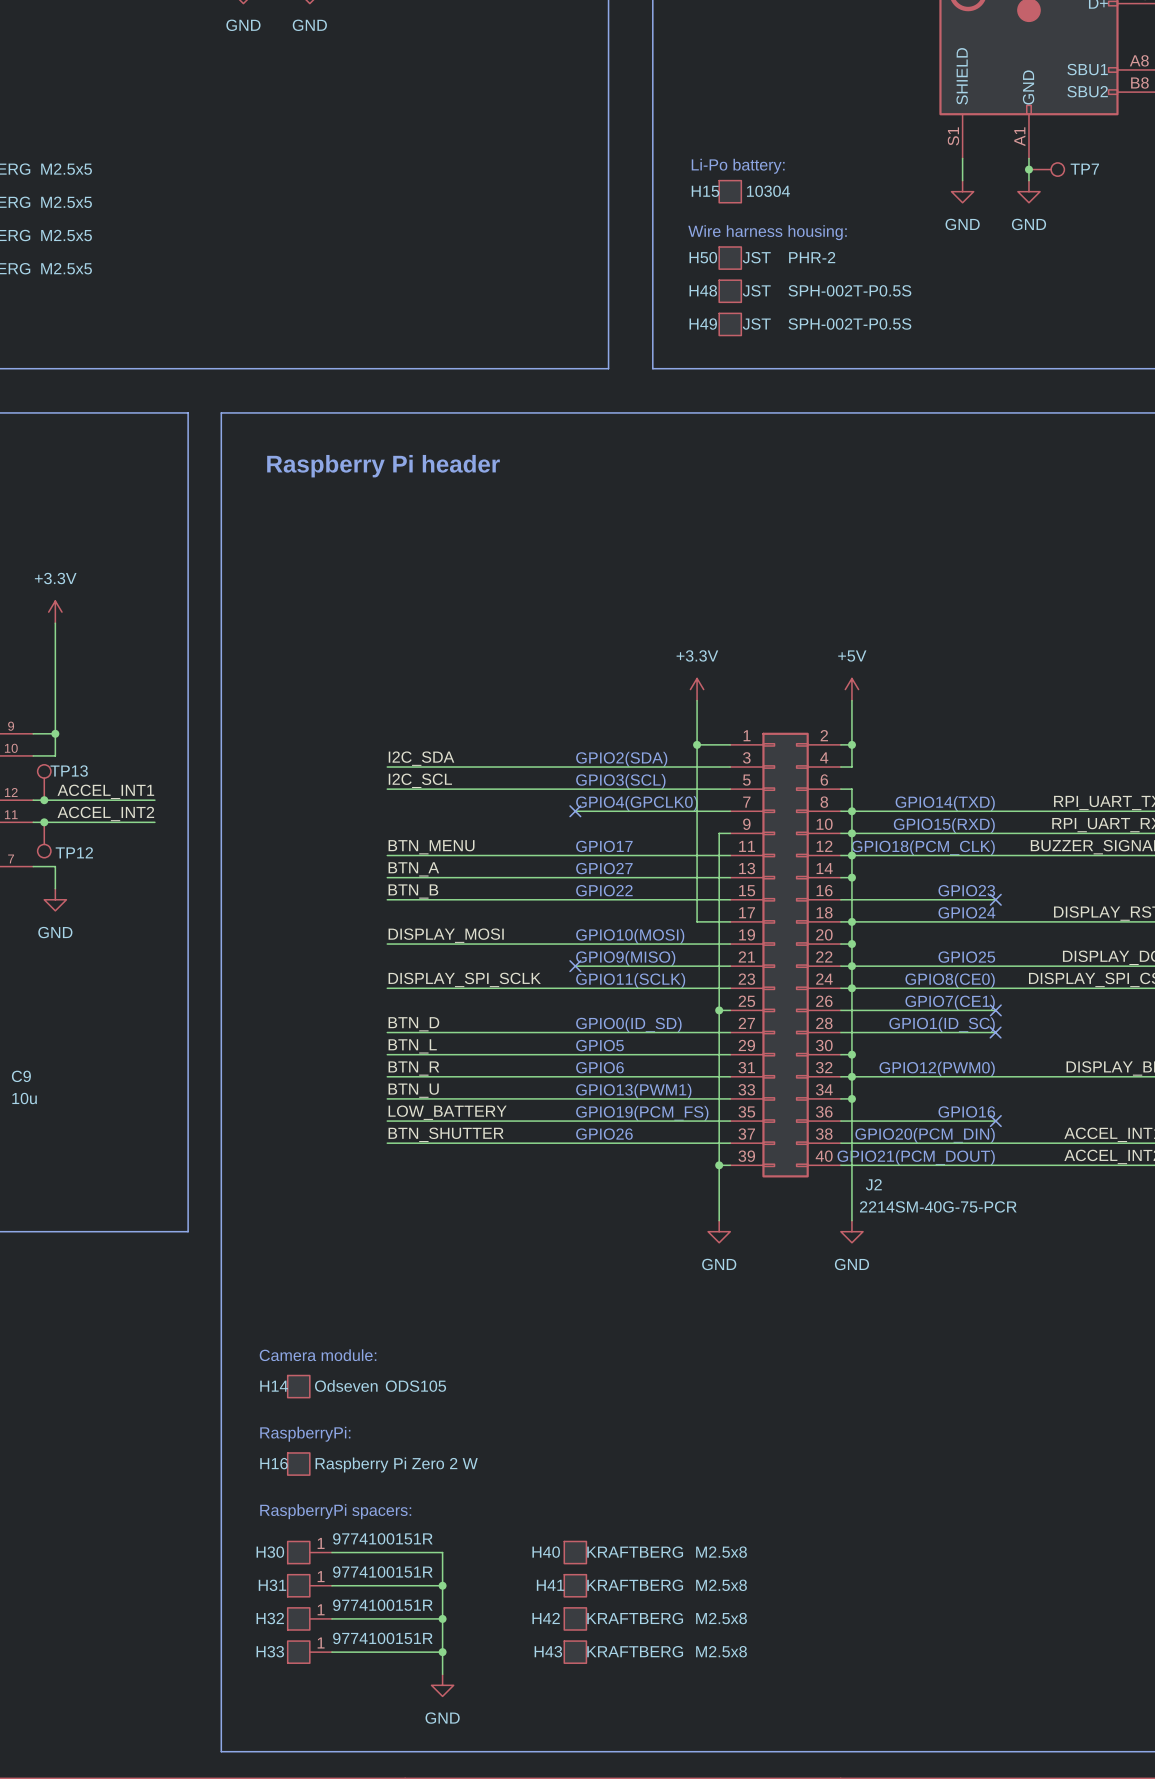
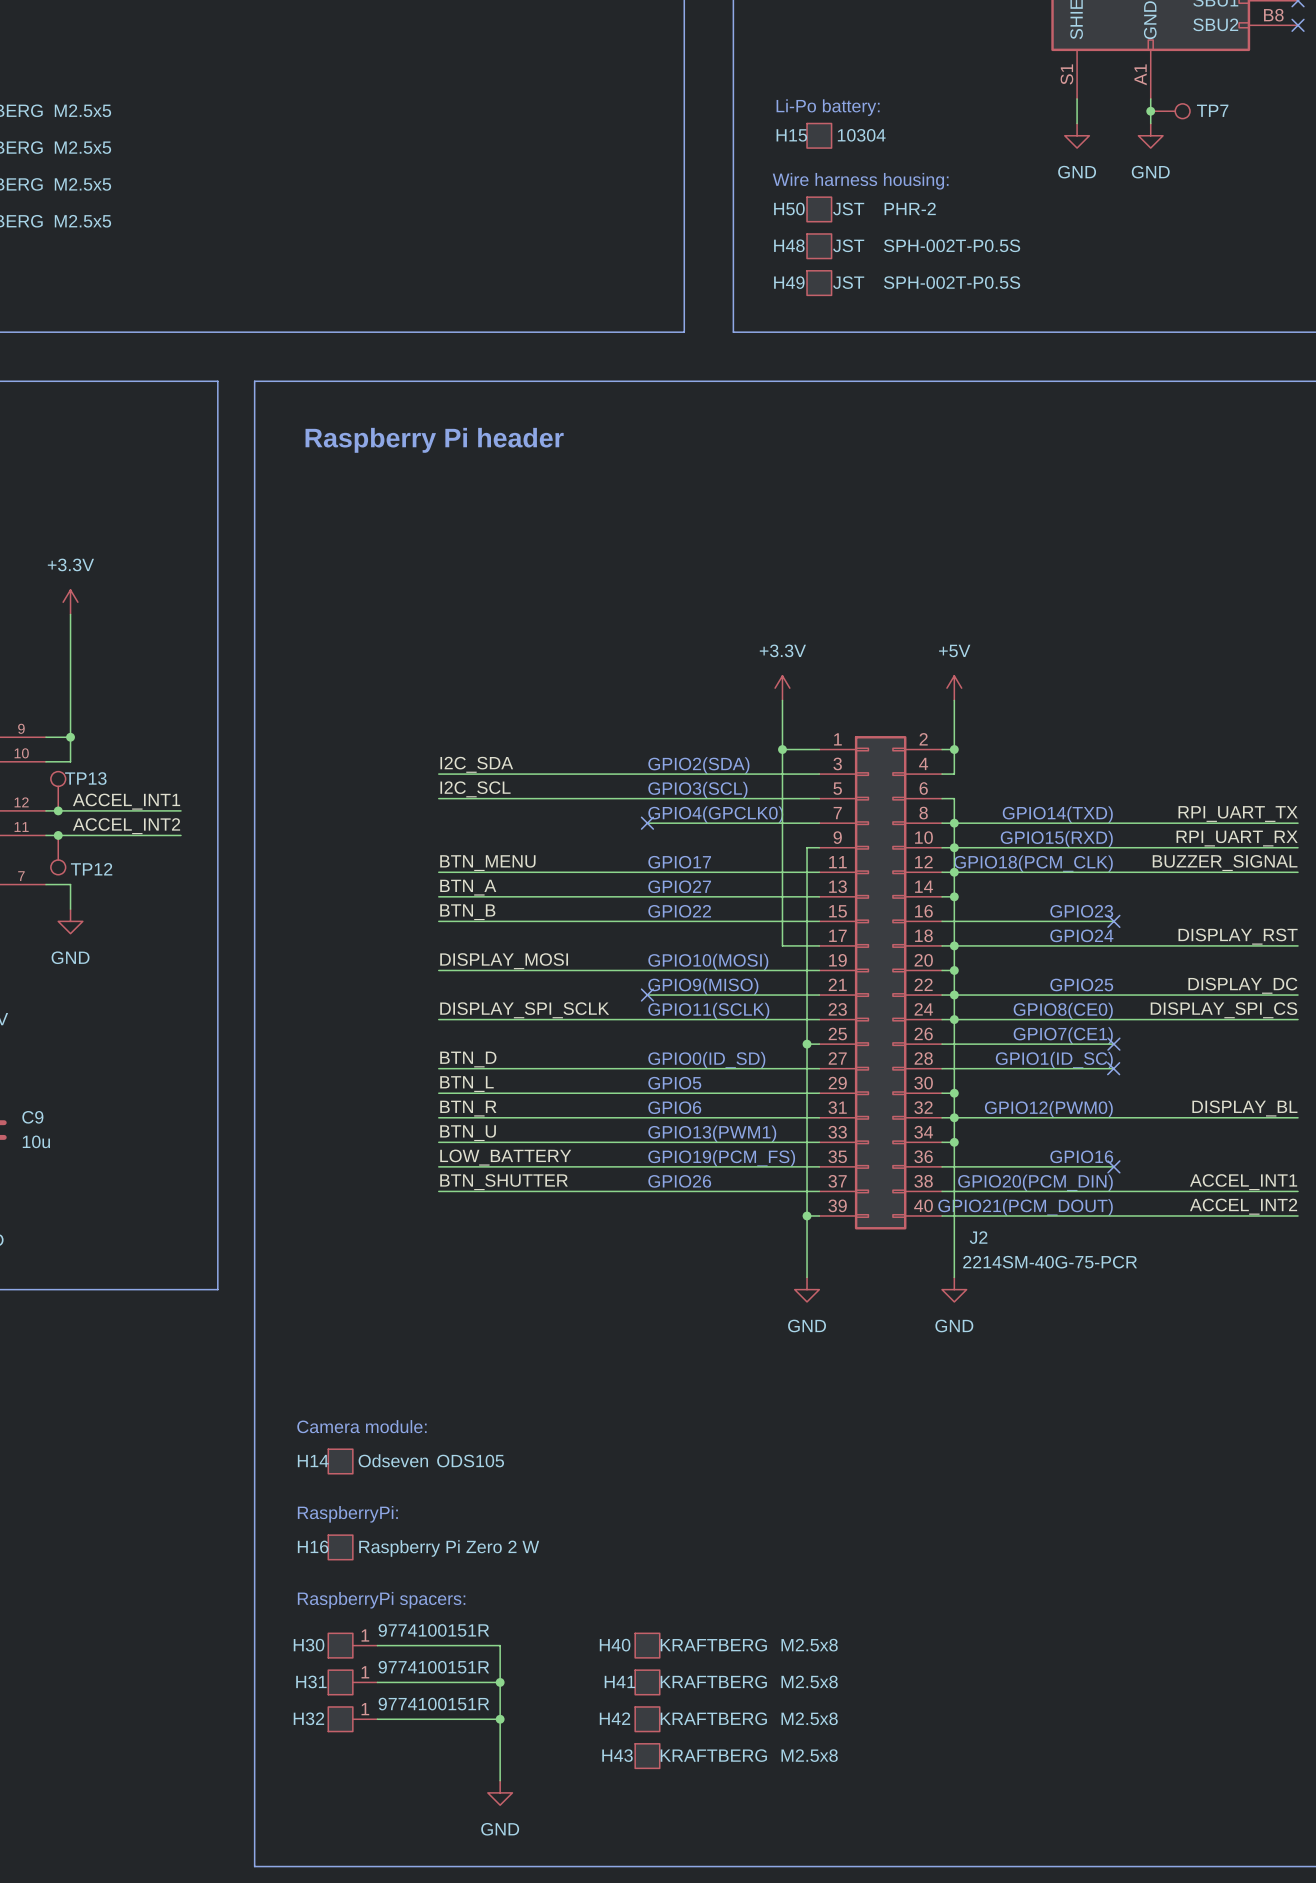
H33: 9774100151R (309, 1652) -> none
wire: (331, 1652) (442, 1652) -> none
junction: (442, 1652) -> none

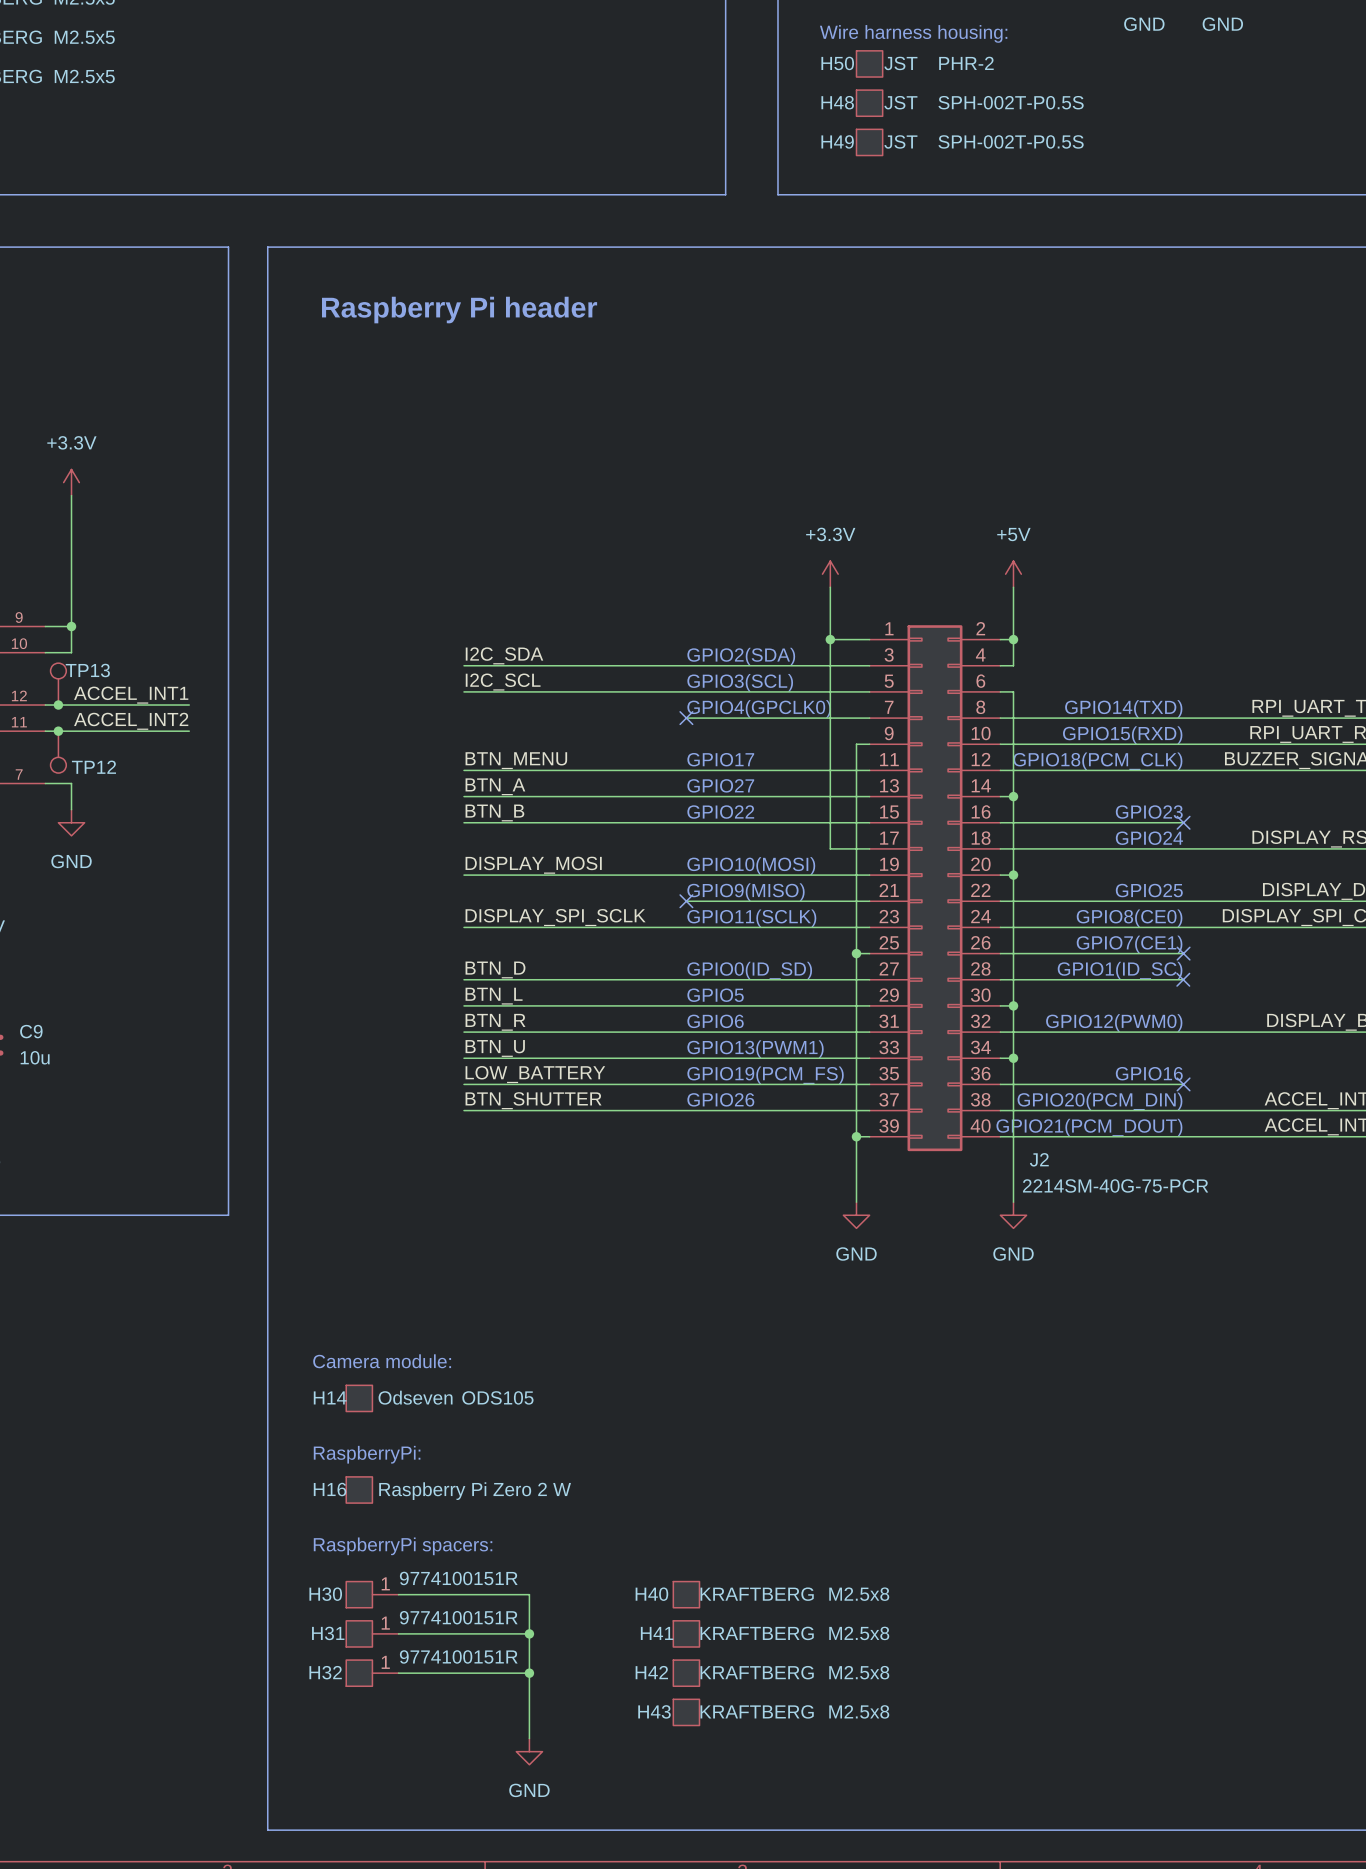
junction: (954, 823) -> none
junction: (954, 847) -> none
junction: (954, 872) -> none
junction: (954, 945) -> none
junction: (954, 995) -> none
junction: (954, 1019) -> none
junction: (954, 1117) -> none

